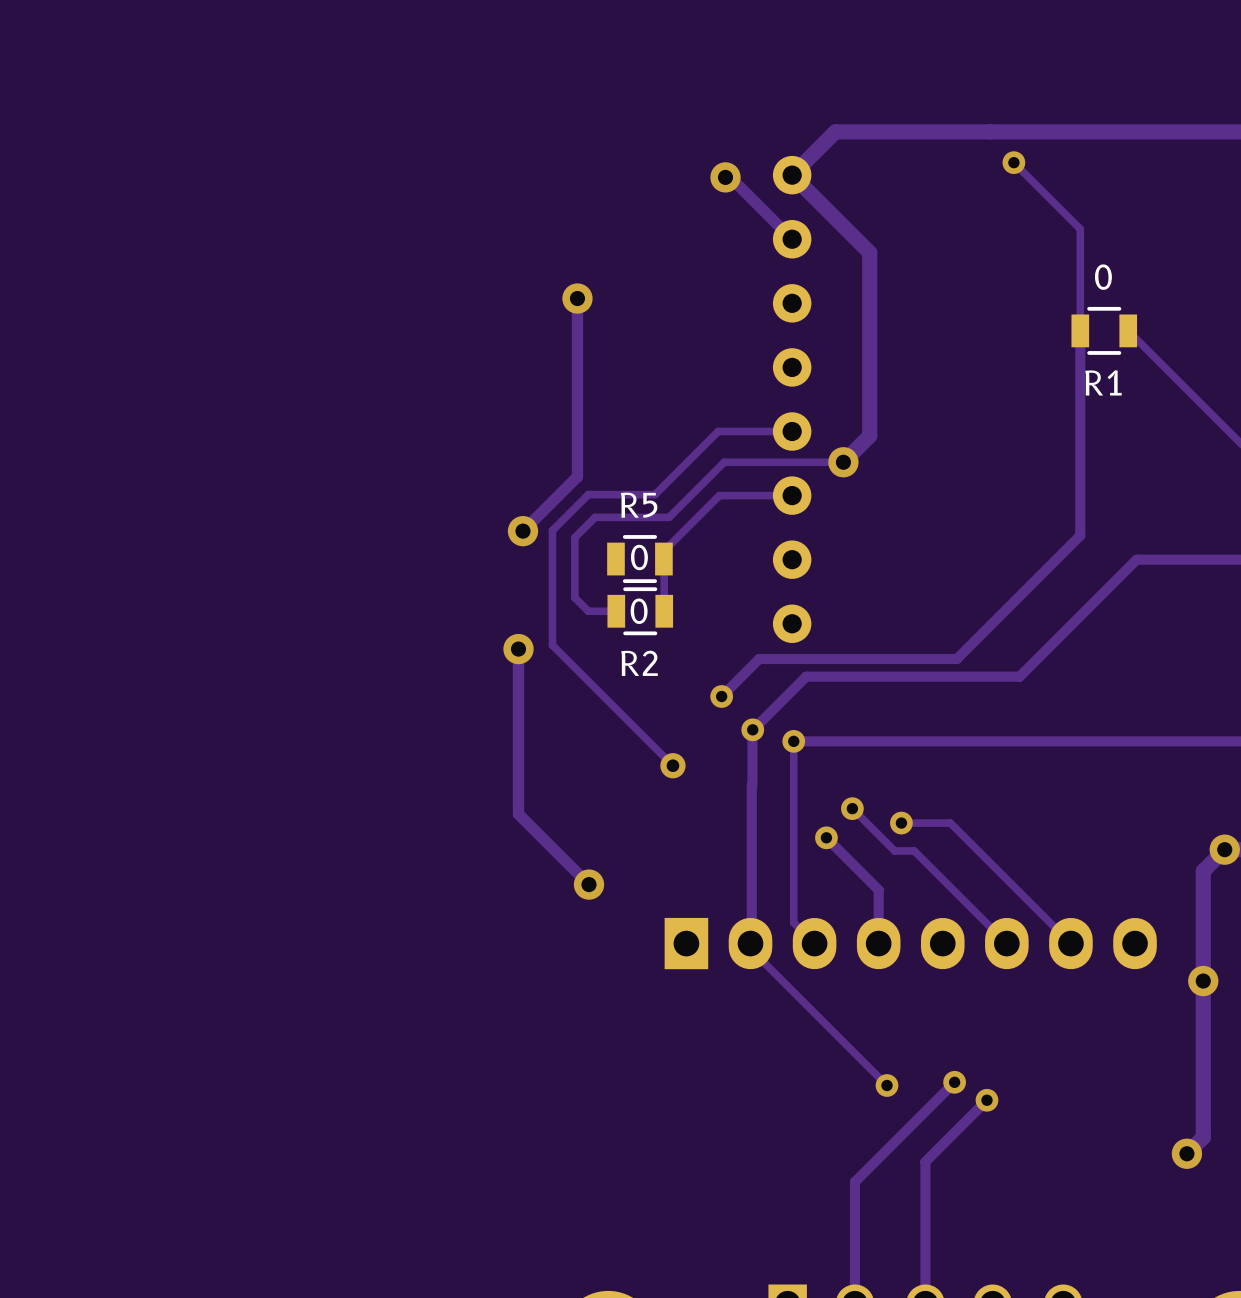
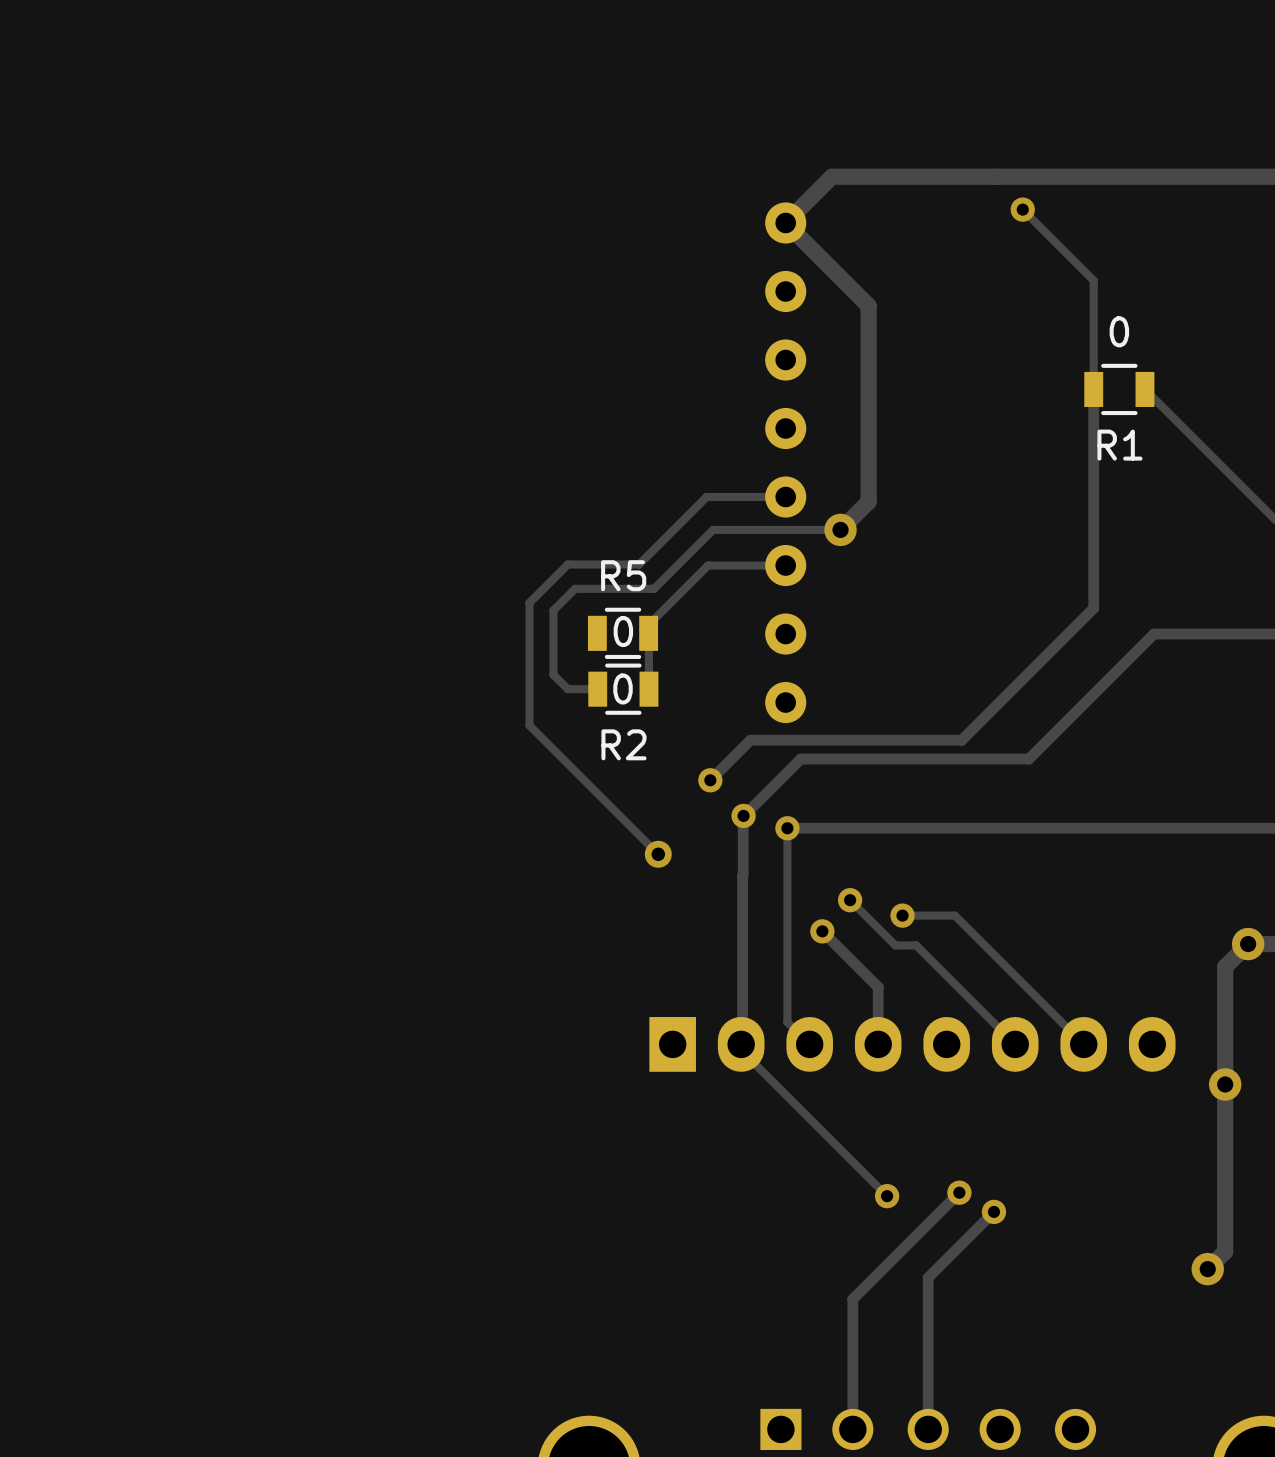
track: (725, 177) (730, 177) (792, 239) -> none
via: (725, 177) -> none
track: (577, 298) (577, 476) (522, 531) -> none
via: (577, 298) -> none
via: (522, 531) -> none
track: (518, 649) (518, 814) (589, 884) -> none
via: (518, 649) -> none
via: (589, 884) -> none

